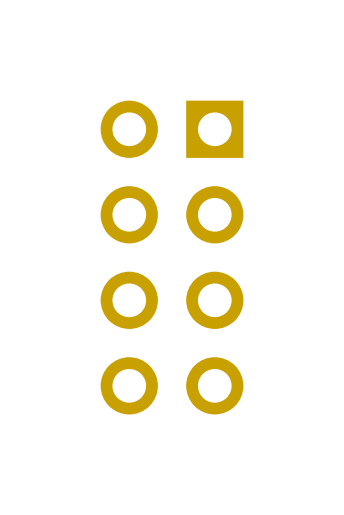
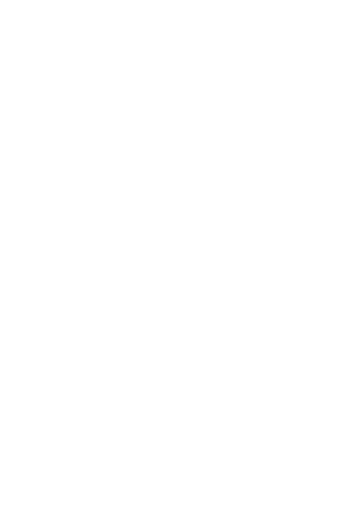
part: (172, 257) -> none

